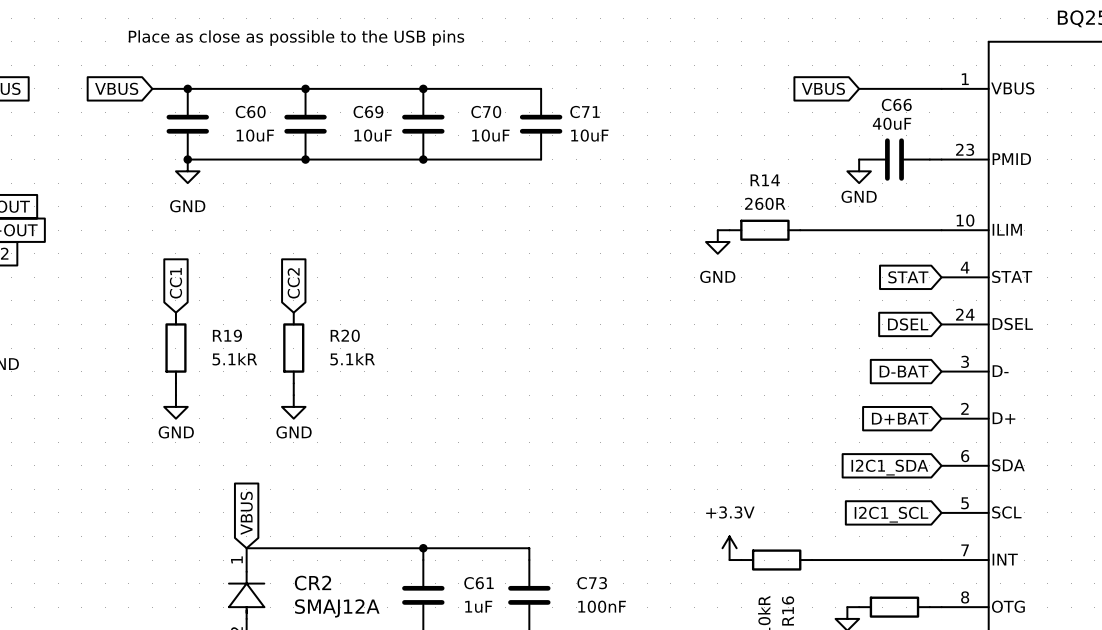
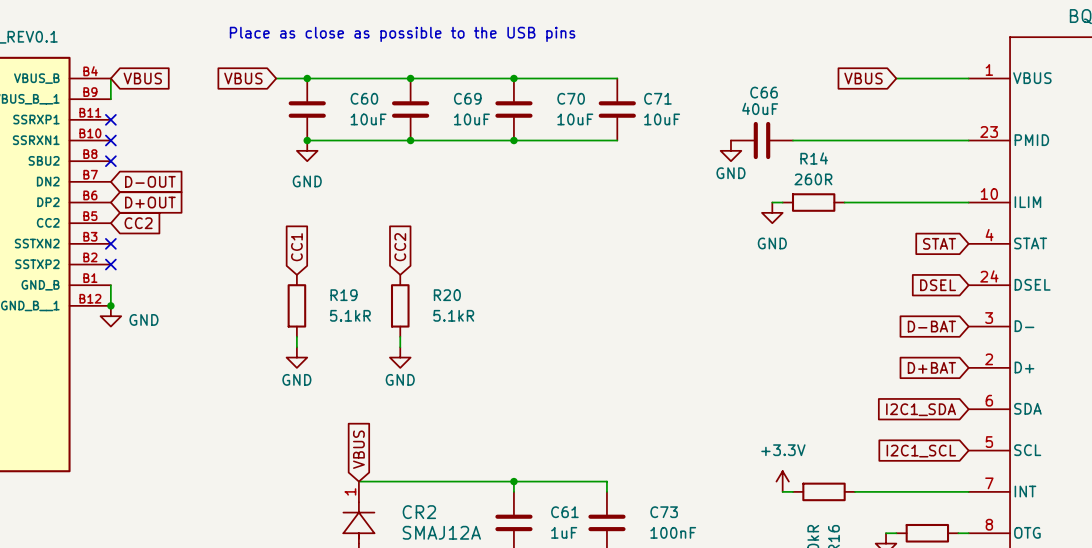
wire: none -> (793, 140) (958, 140)
C66 position: (894, 159) -> (761, 140)
power symbol position: GND (859, 171) -> GND (730, 150)

